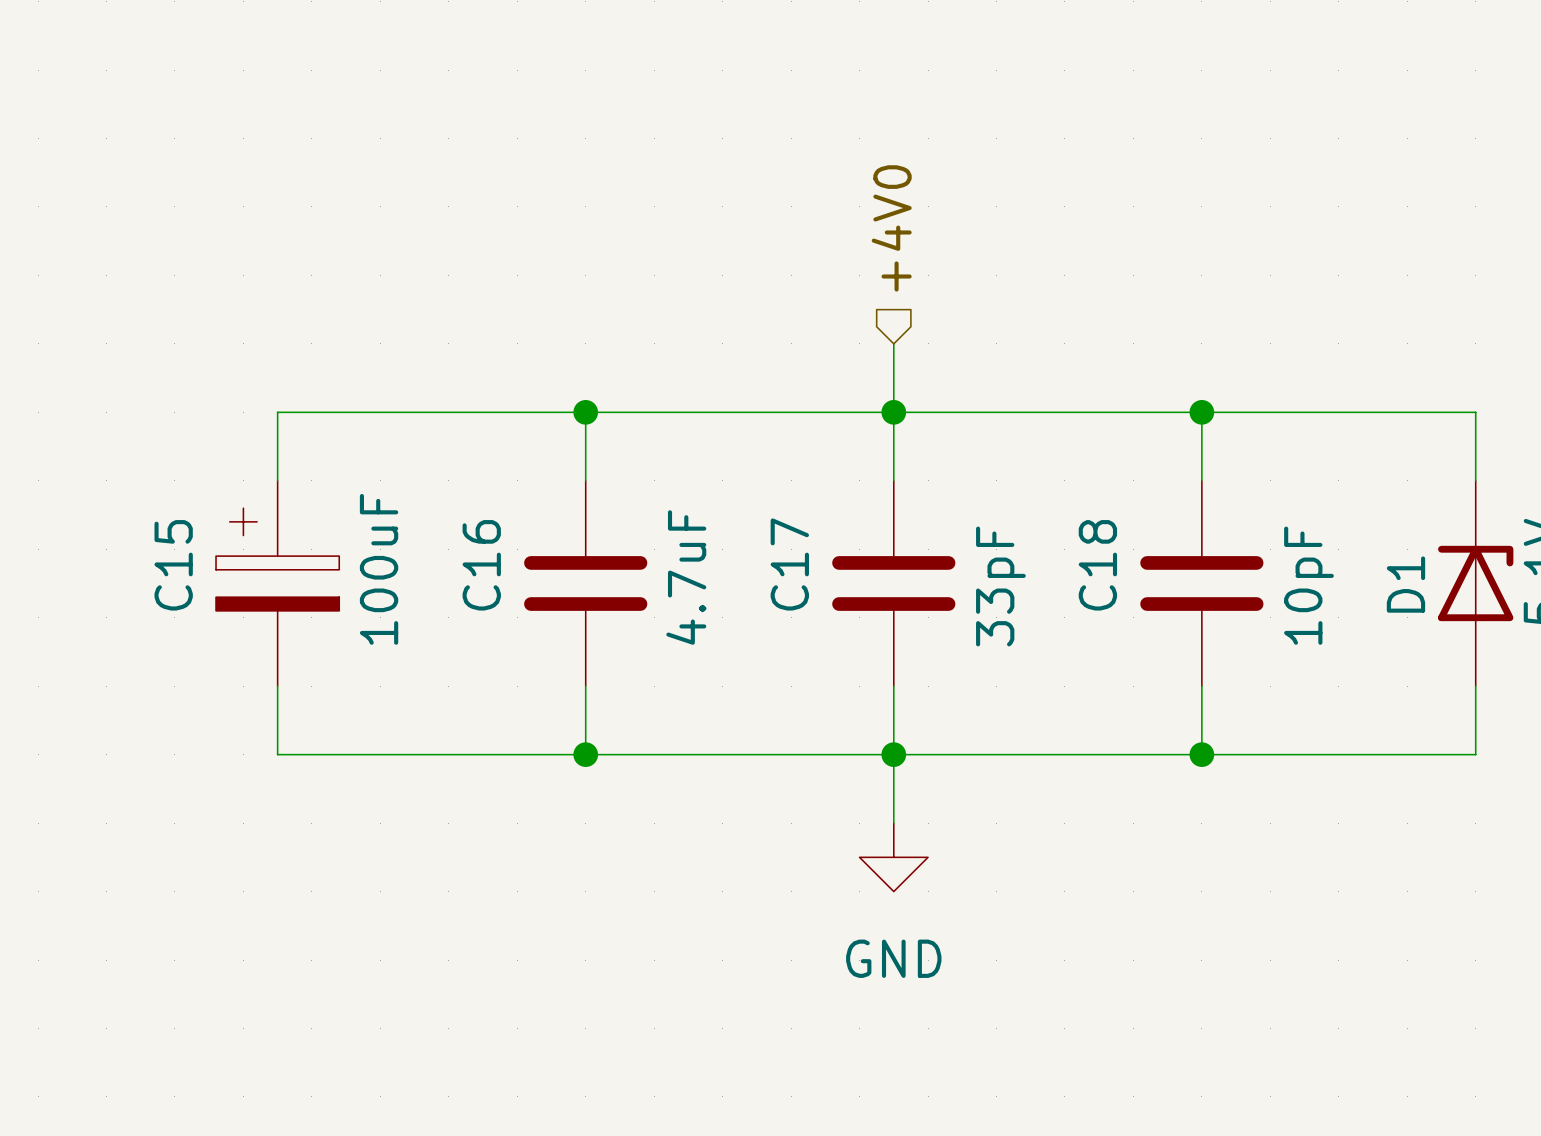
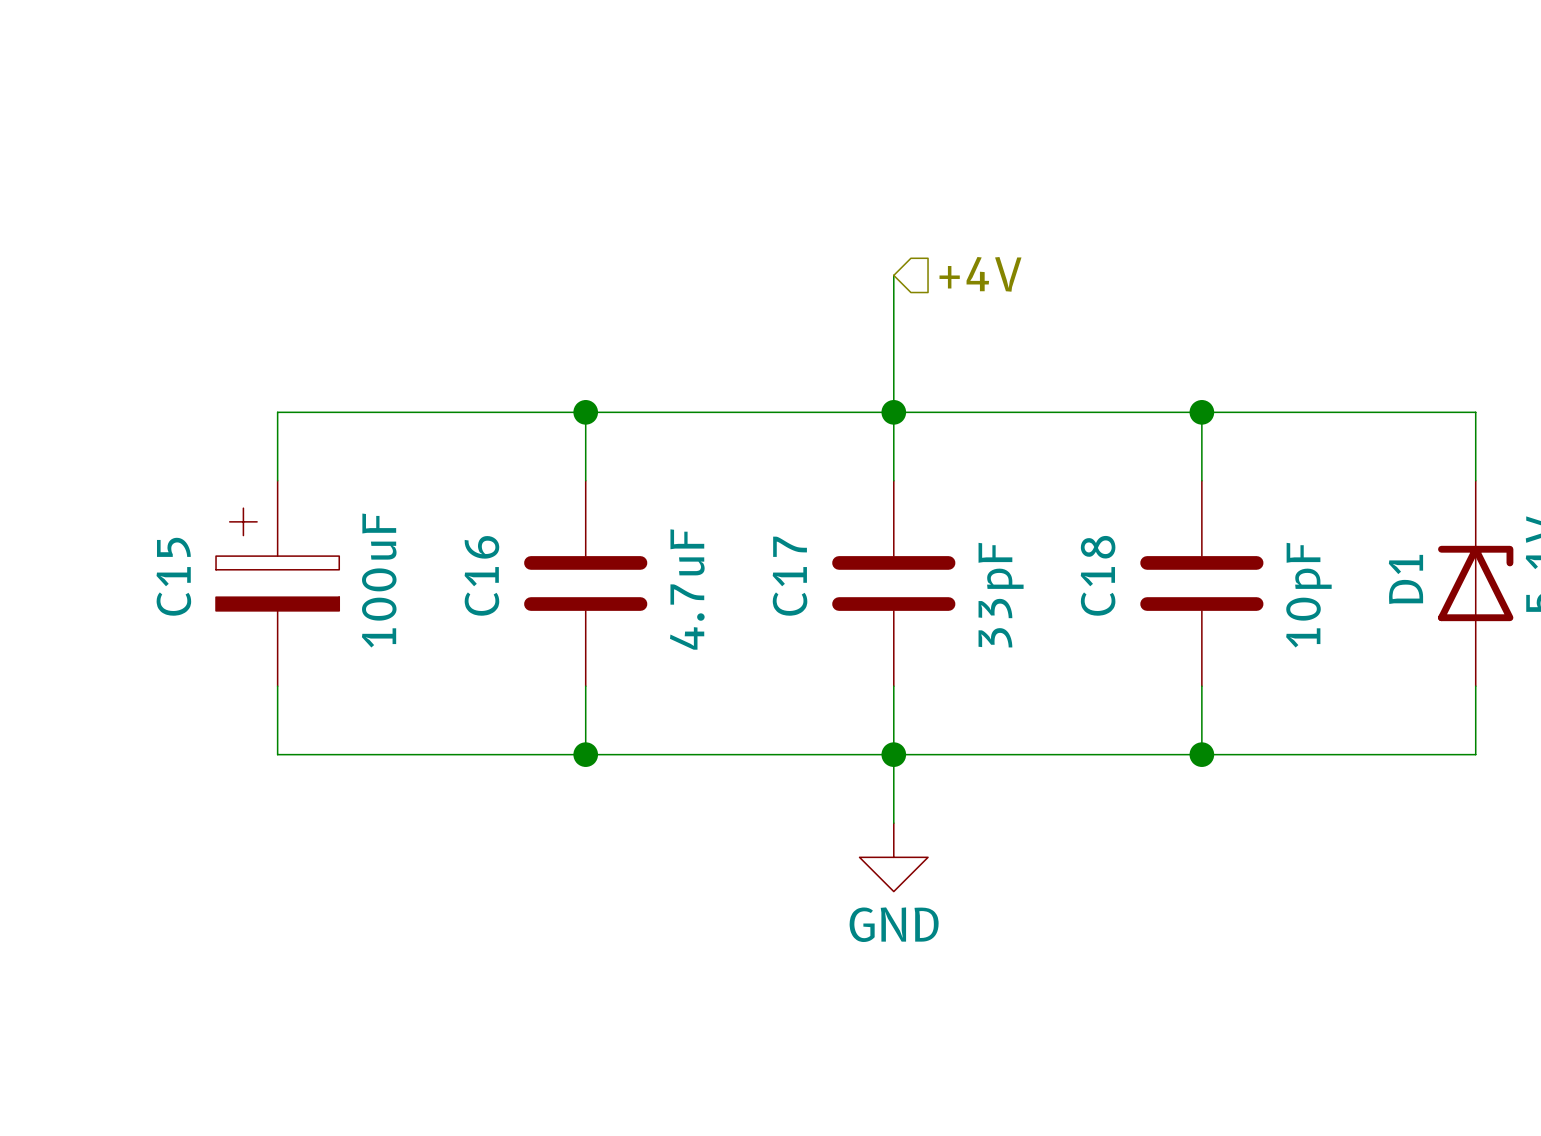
hierarchical label: +4V0 (891, 228) -> none
hierarchical label: none -> +4V (980, 274)
wire: none -> (893, 275) (893, 343)
power symbol text position: GND (893, 958) -> GND (894, 924)

